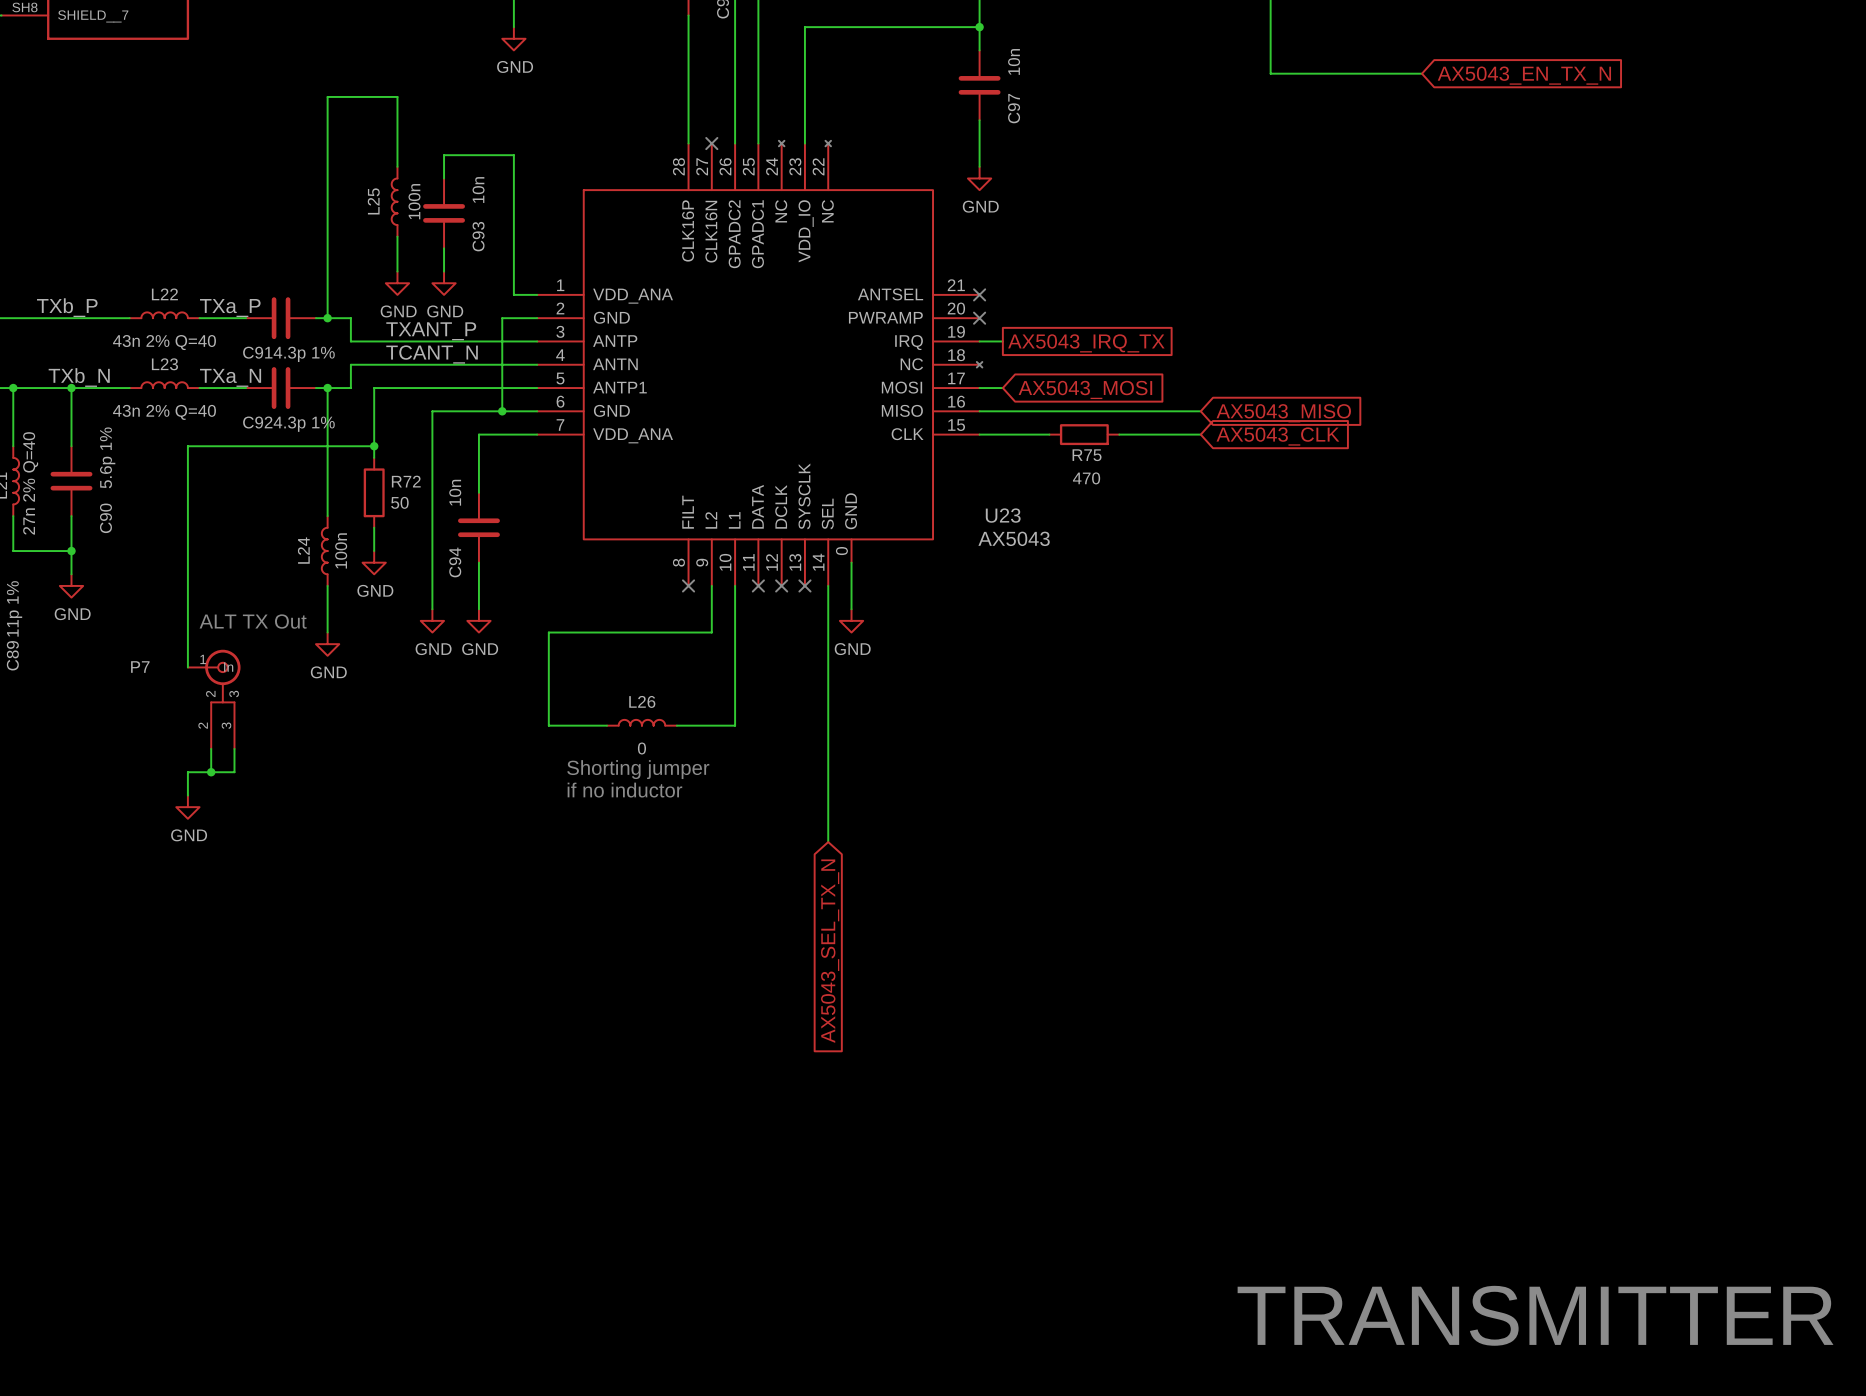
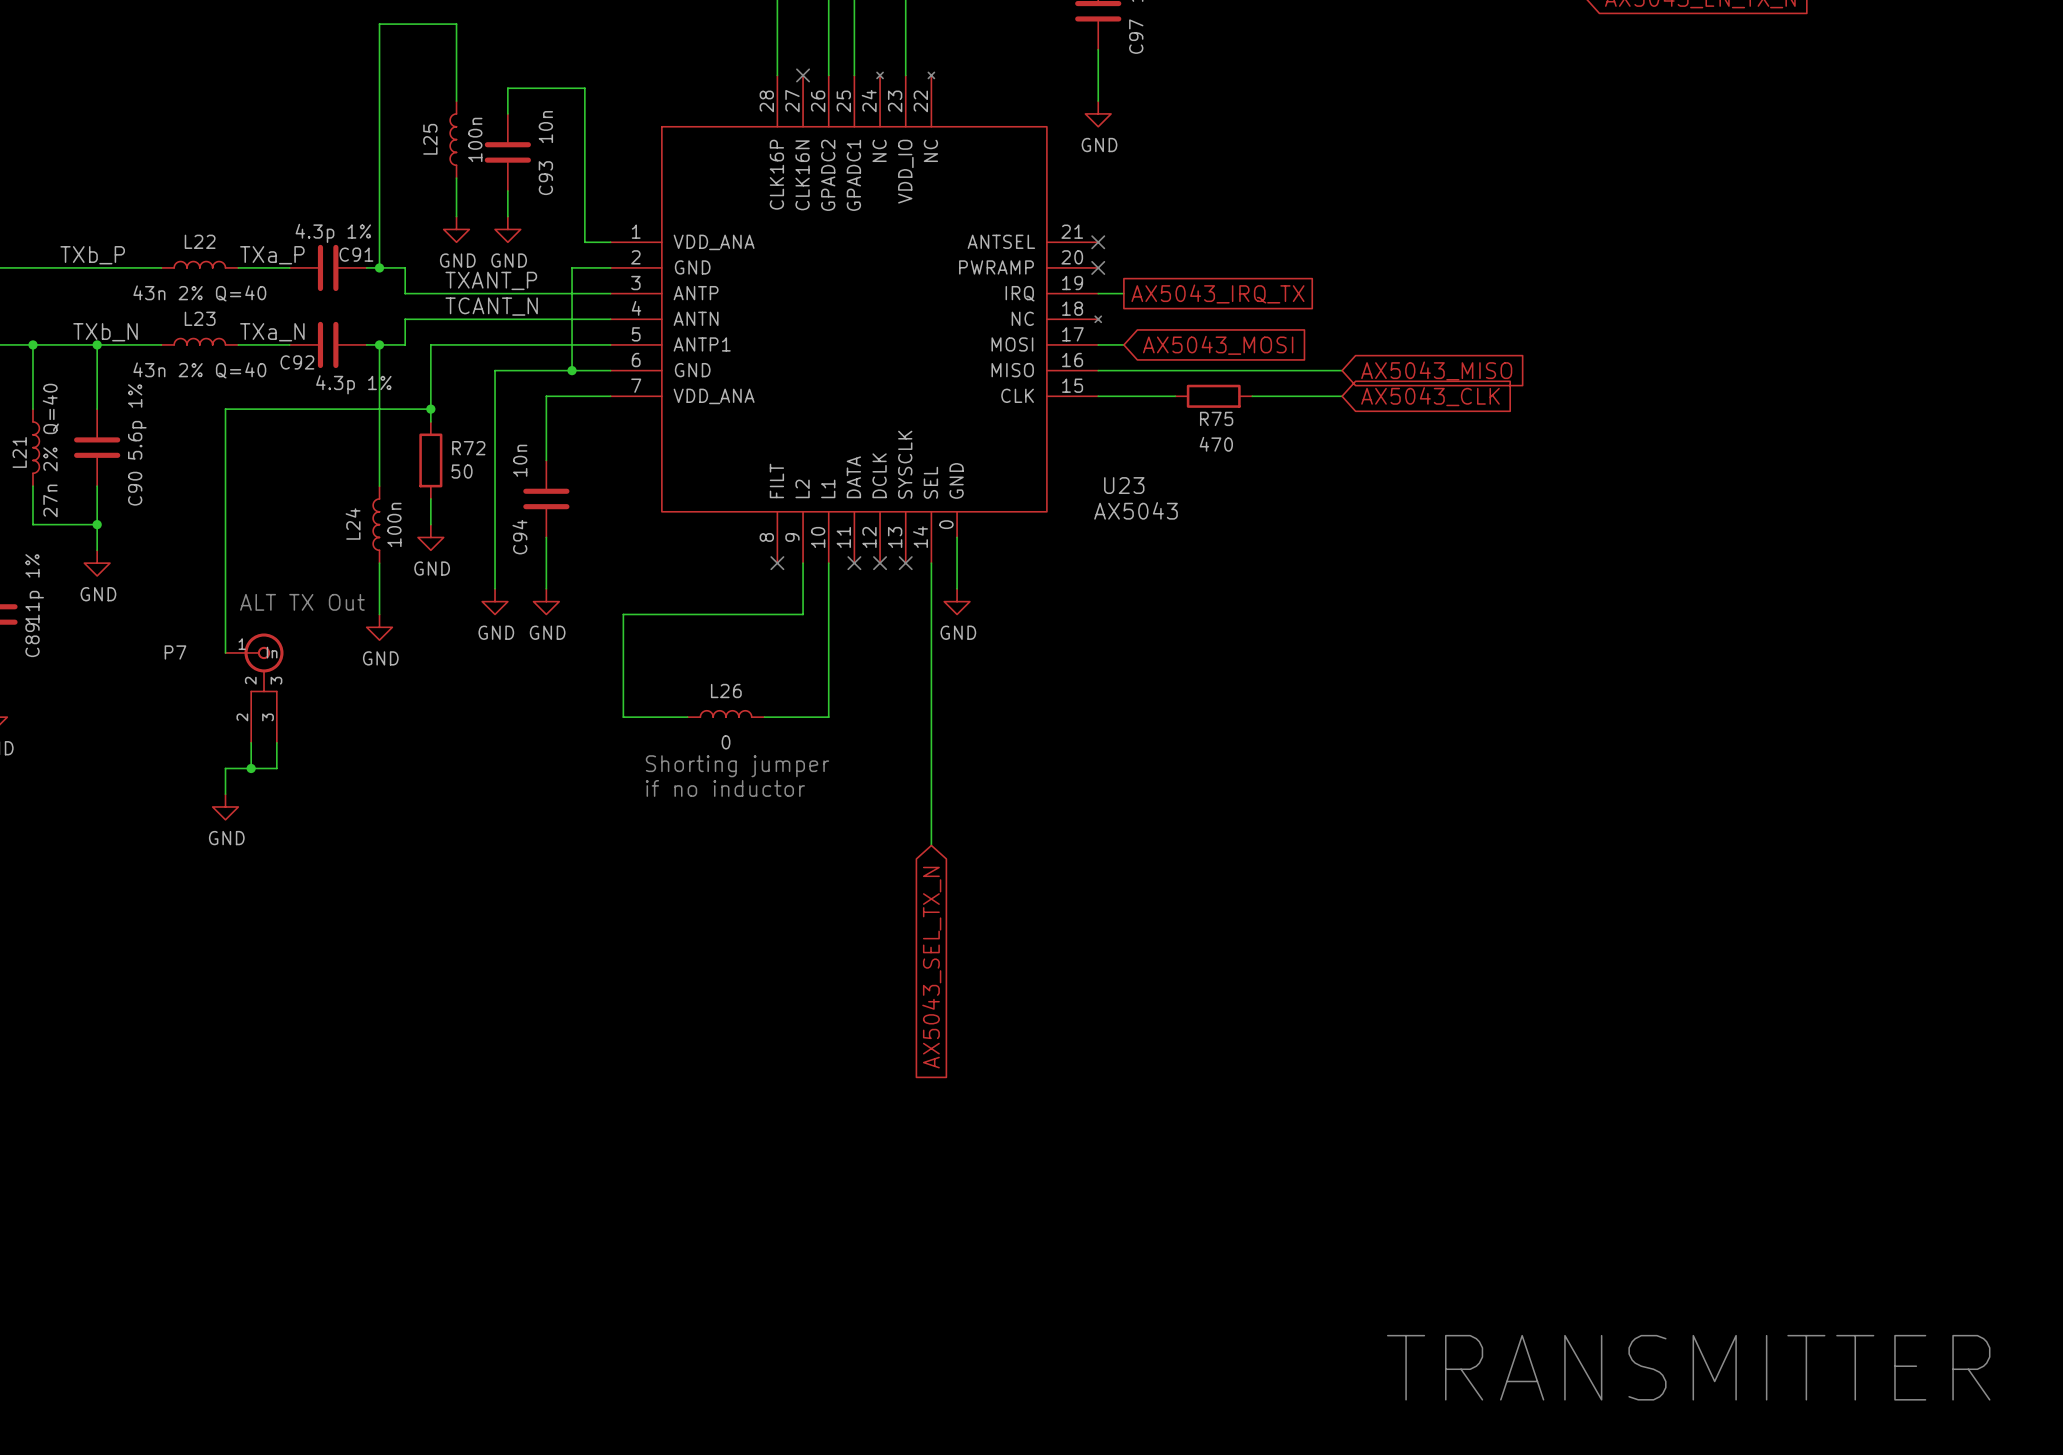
C91 name position: C91 (257, 352) -> C91 (356, 254)
C91 value position: 4.3p 1% (304, 354) -> 4.3p 1% (333, 233)
C92 name position: C92 (257, 422) -> C92 (297, 362)

